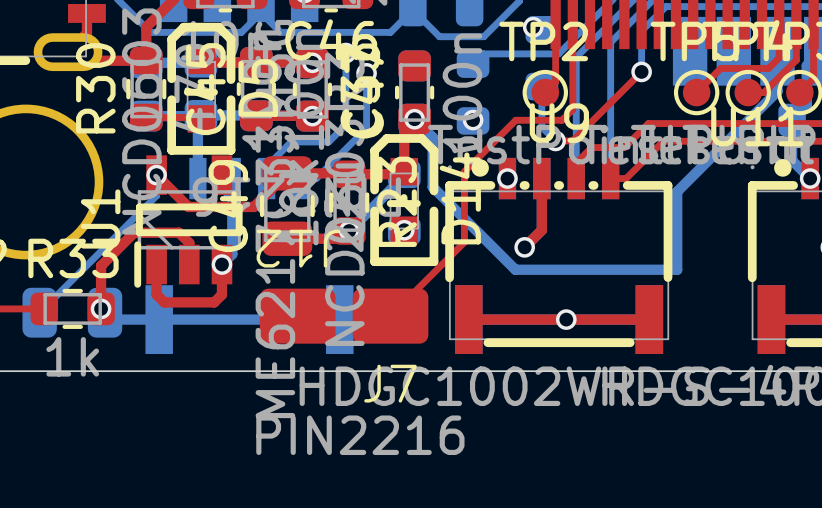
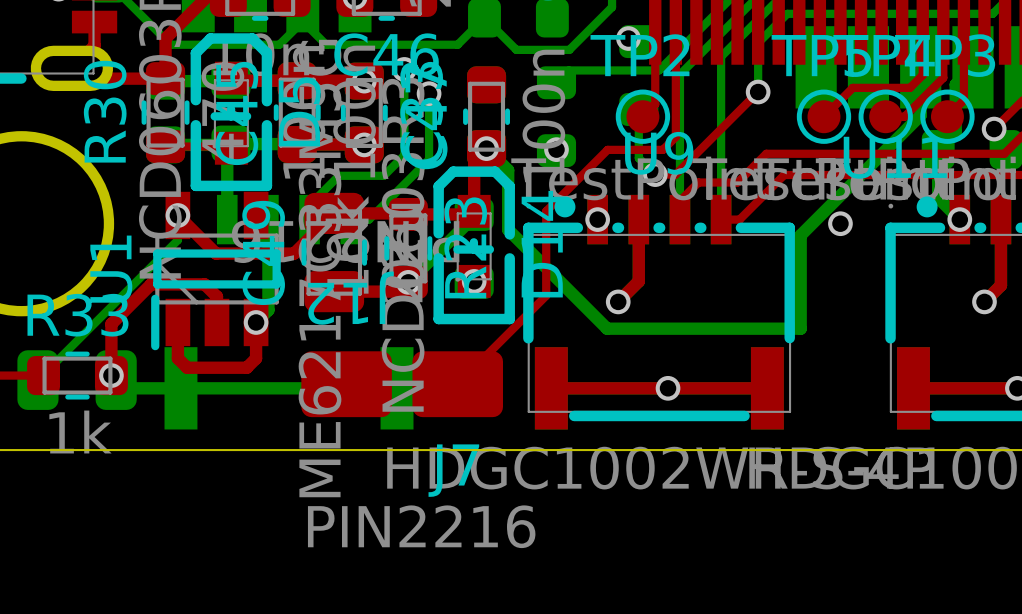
via: none -> (840, 223)

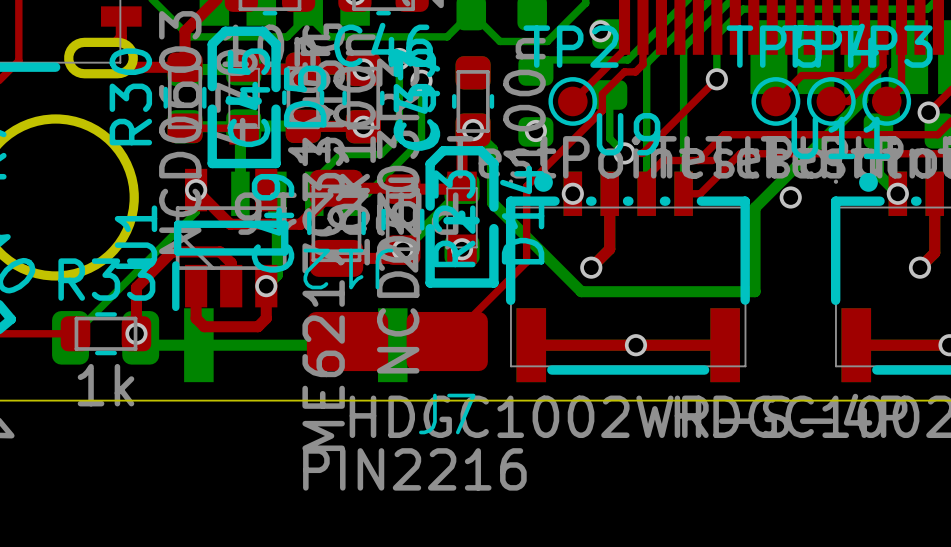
top track: (655, 59) (655, 104) (642, 116) -> (624, 49) (572, 101)
top track: (675, 75) (675, 136) (662, 149) (607, 149) -> (642, 64) (635, 71) (624, 71) (602, 94) (602, 110) (581, 131)
TP2 position: (642, 116) -> (572, 101)
top track: (698, 182) (737, 182) -> (663, 160) (712, 160)

